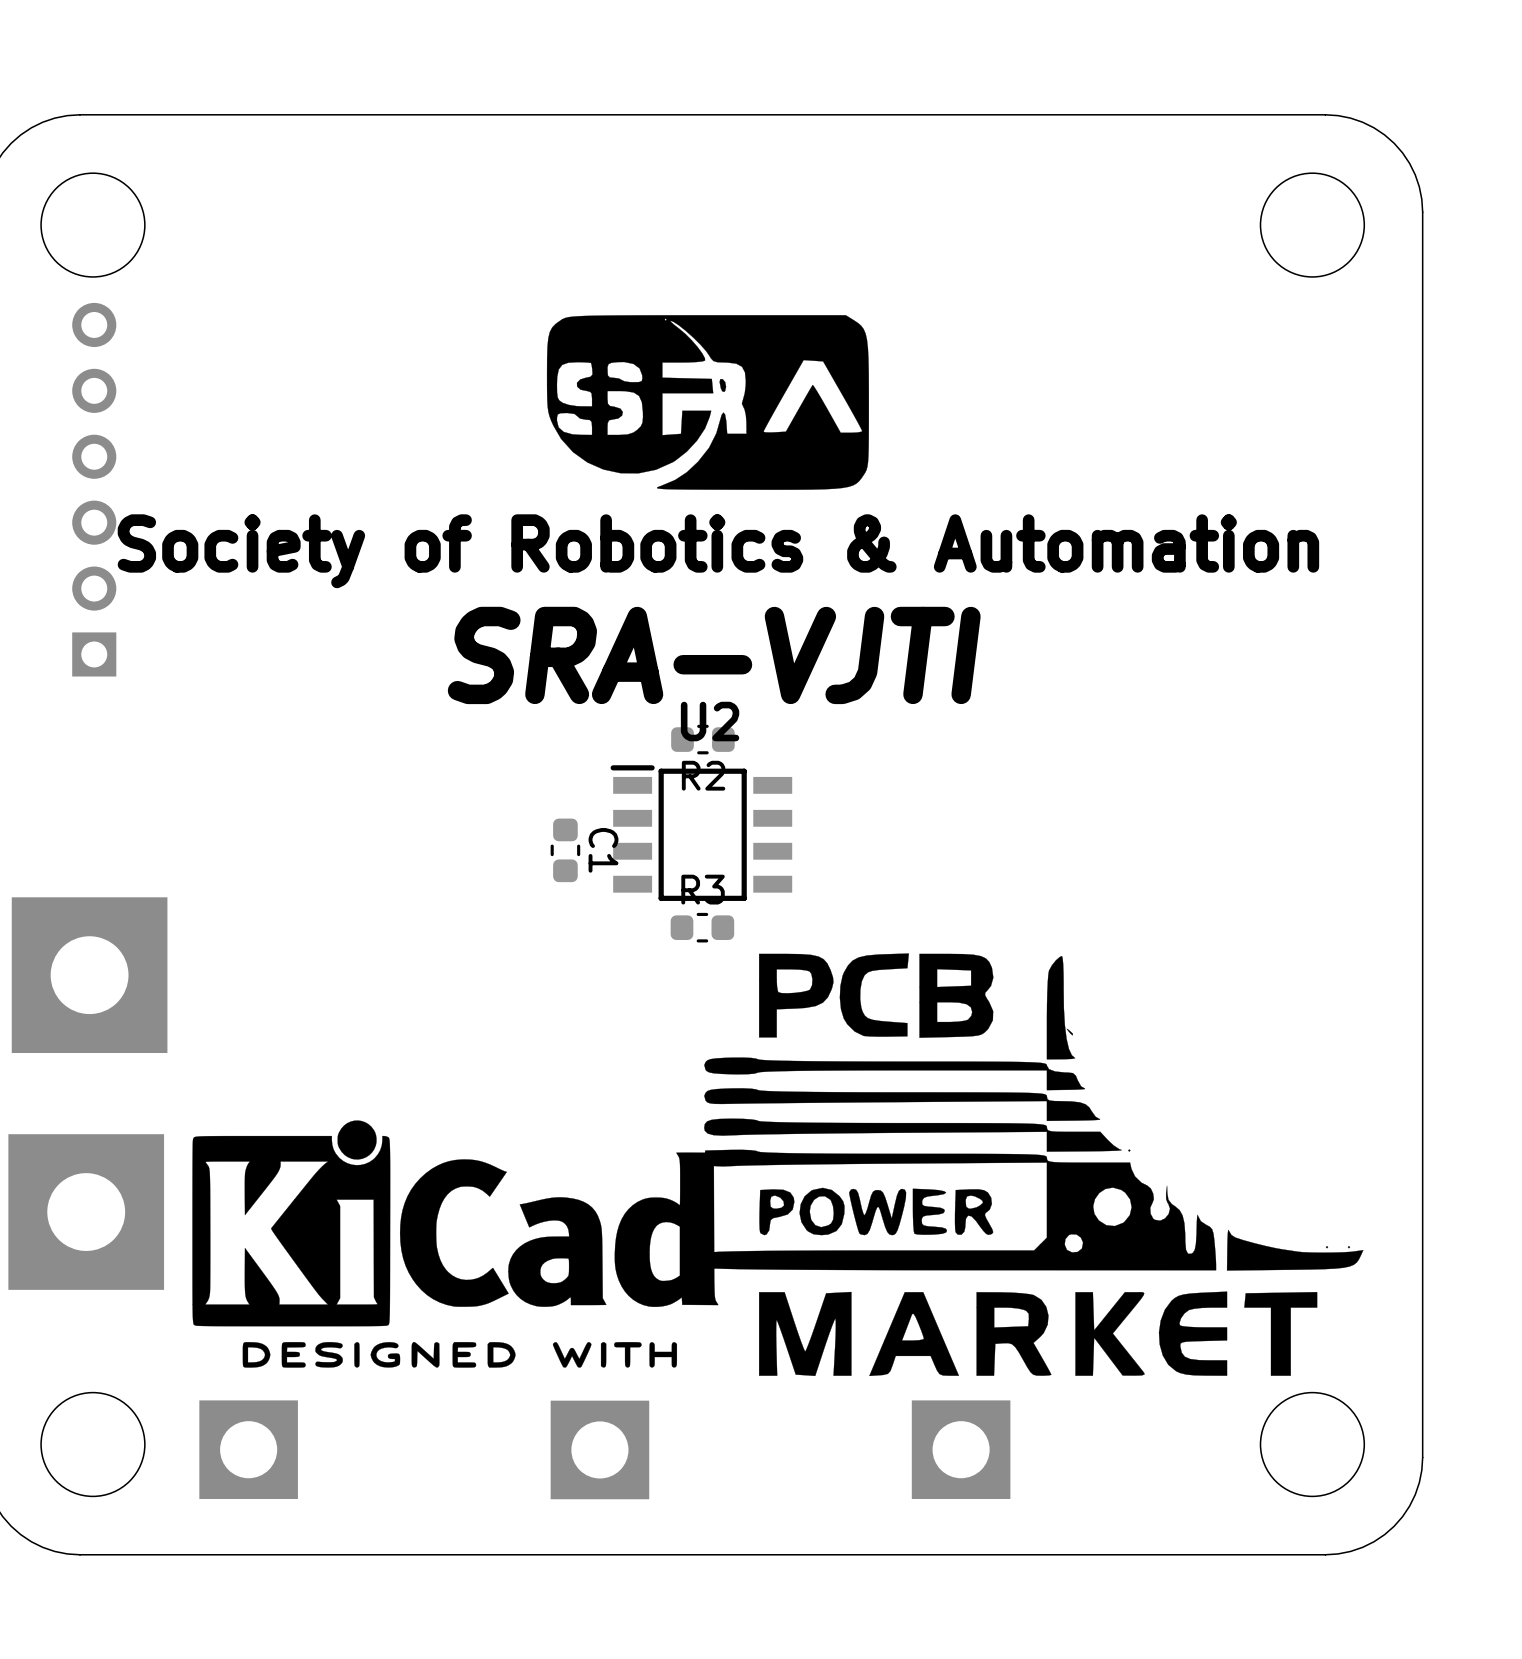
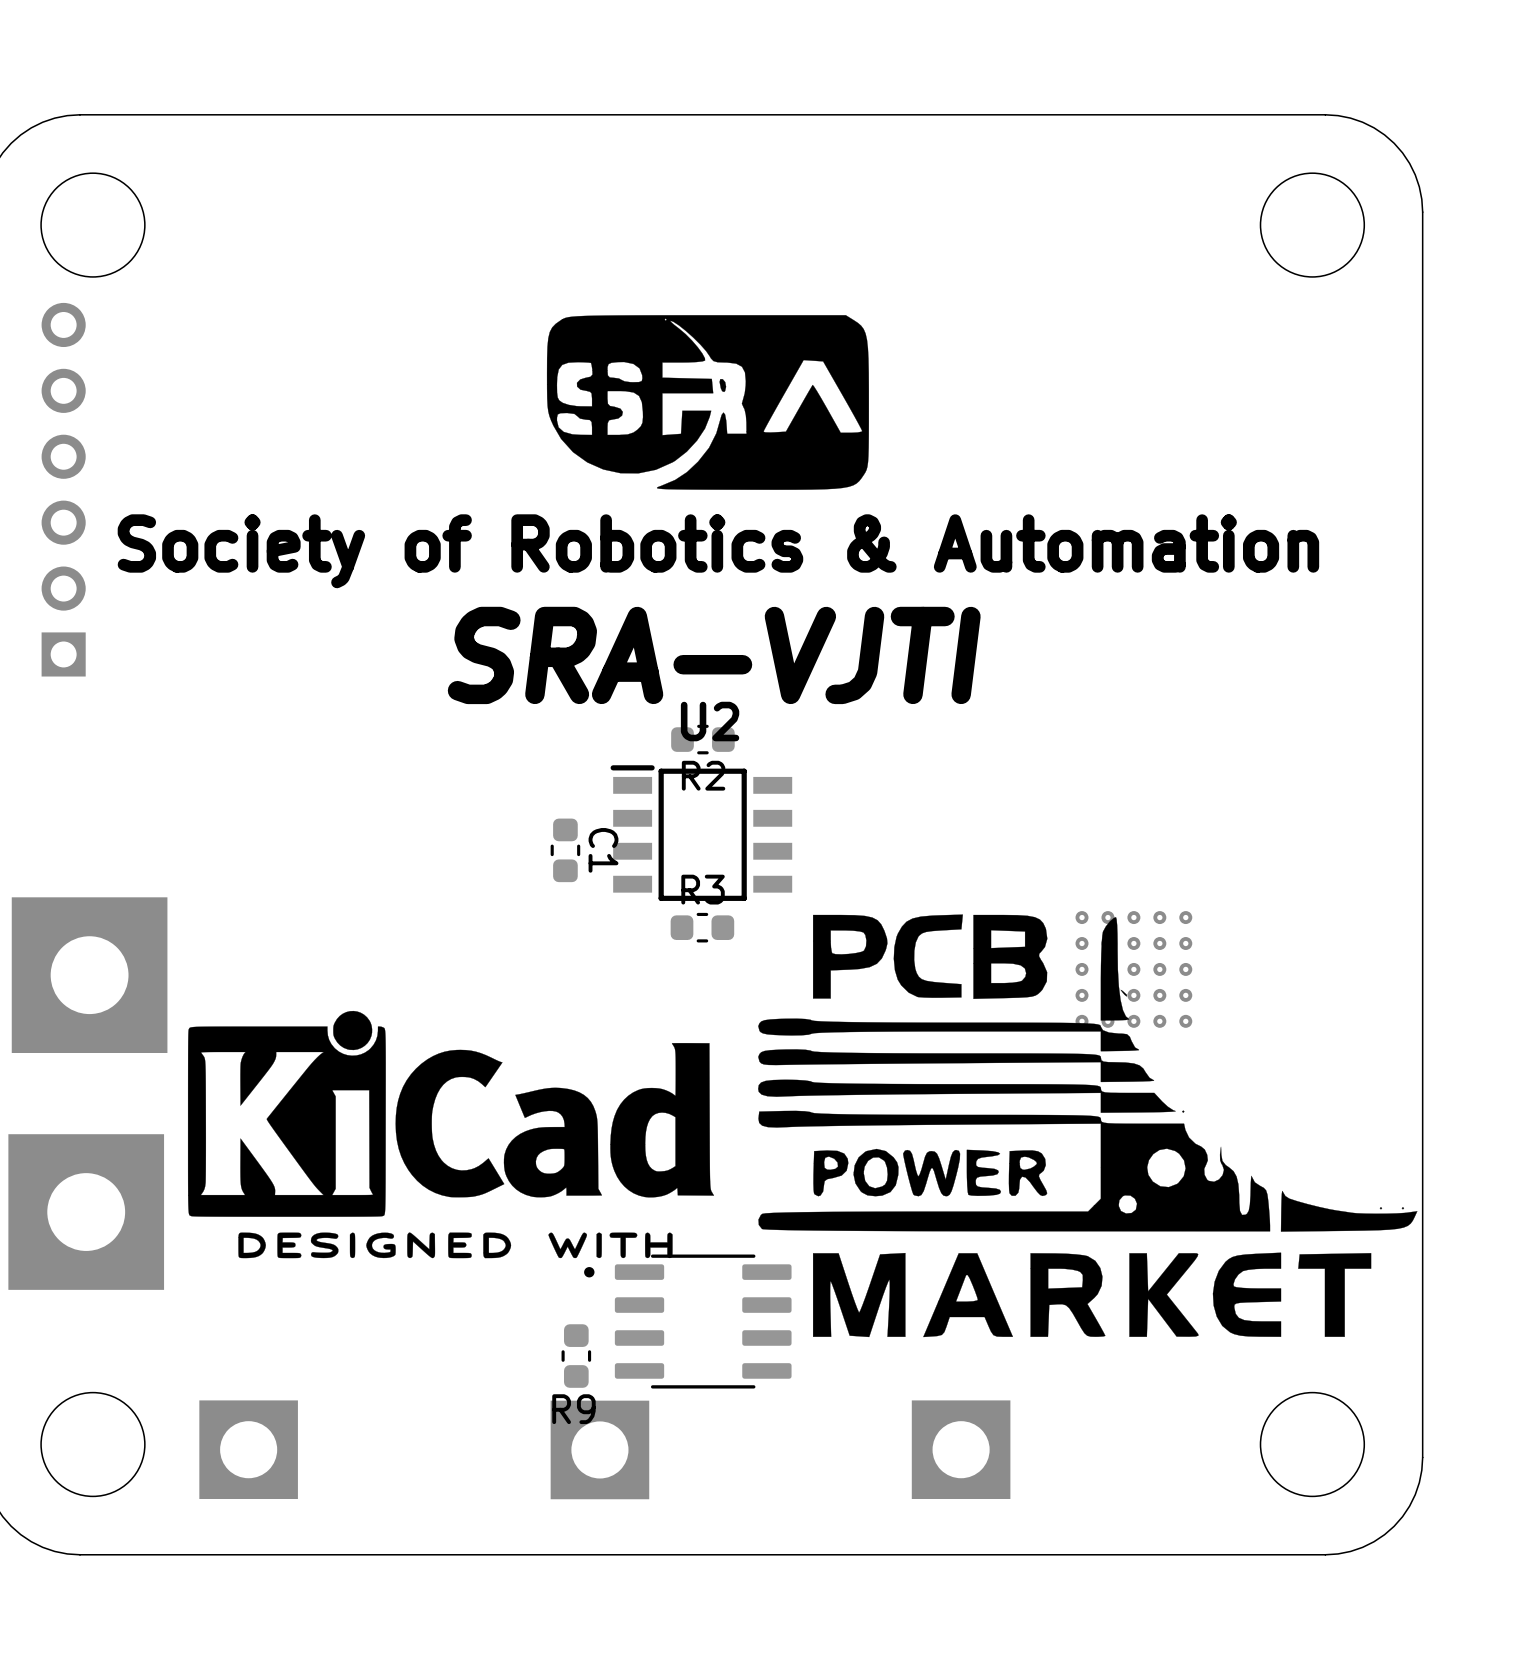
part position: (94, 489) -> (63, 489)
part: none -> (1133, 969)
drawing position: (1033, 1164) -> (1087, 1125)
drawing position: (455, 1244) -> (451, 1134)
part: none -> (687, 1321)
R9: none -> (576, 1356)

